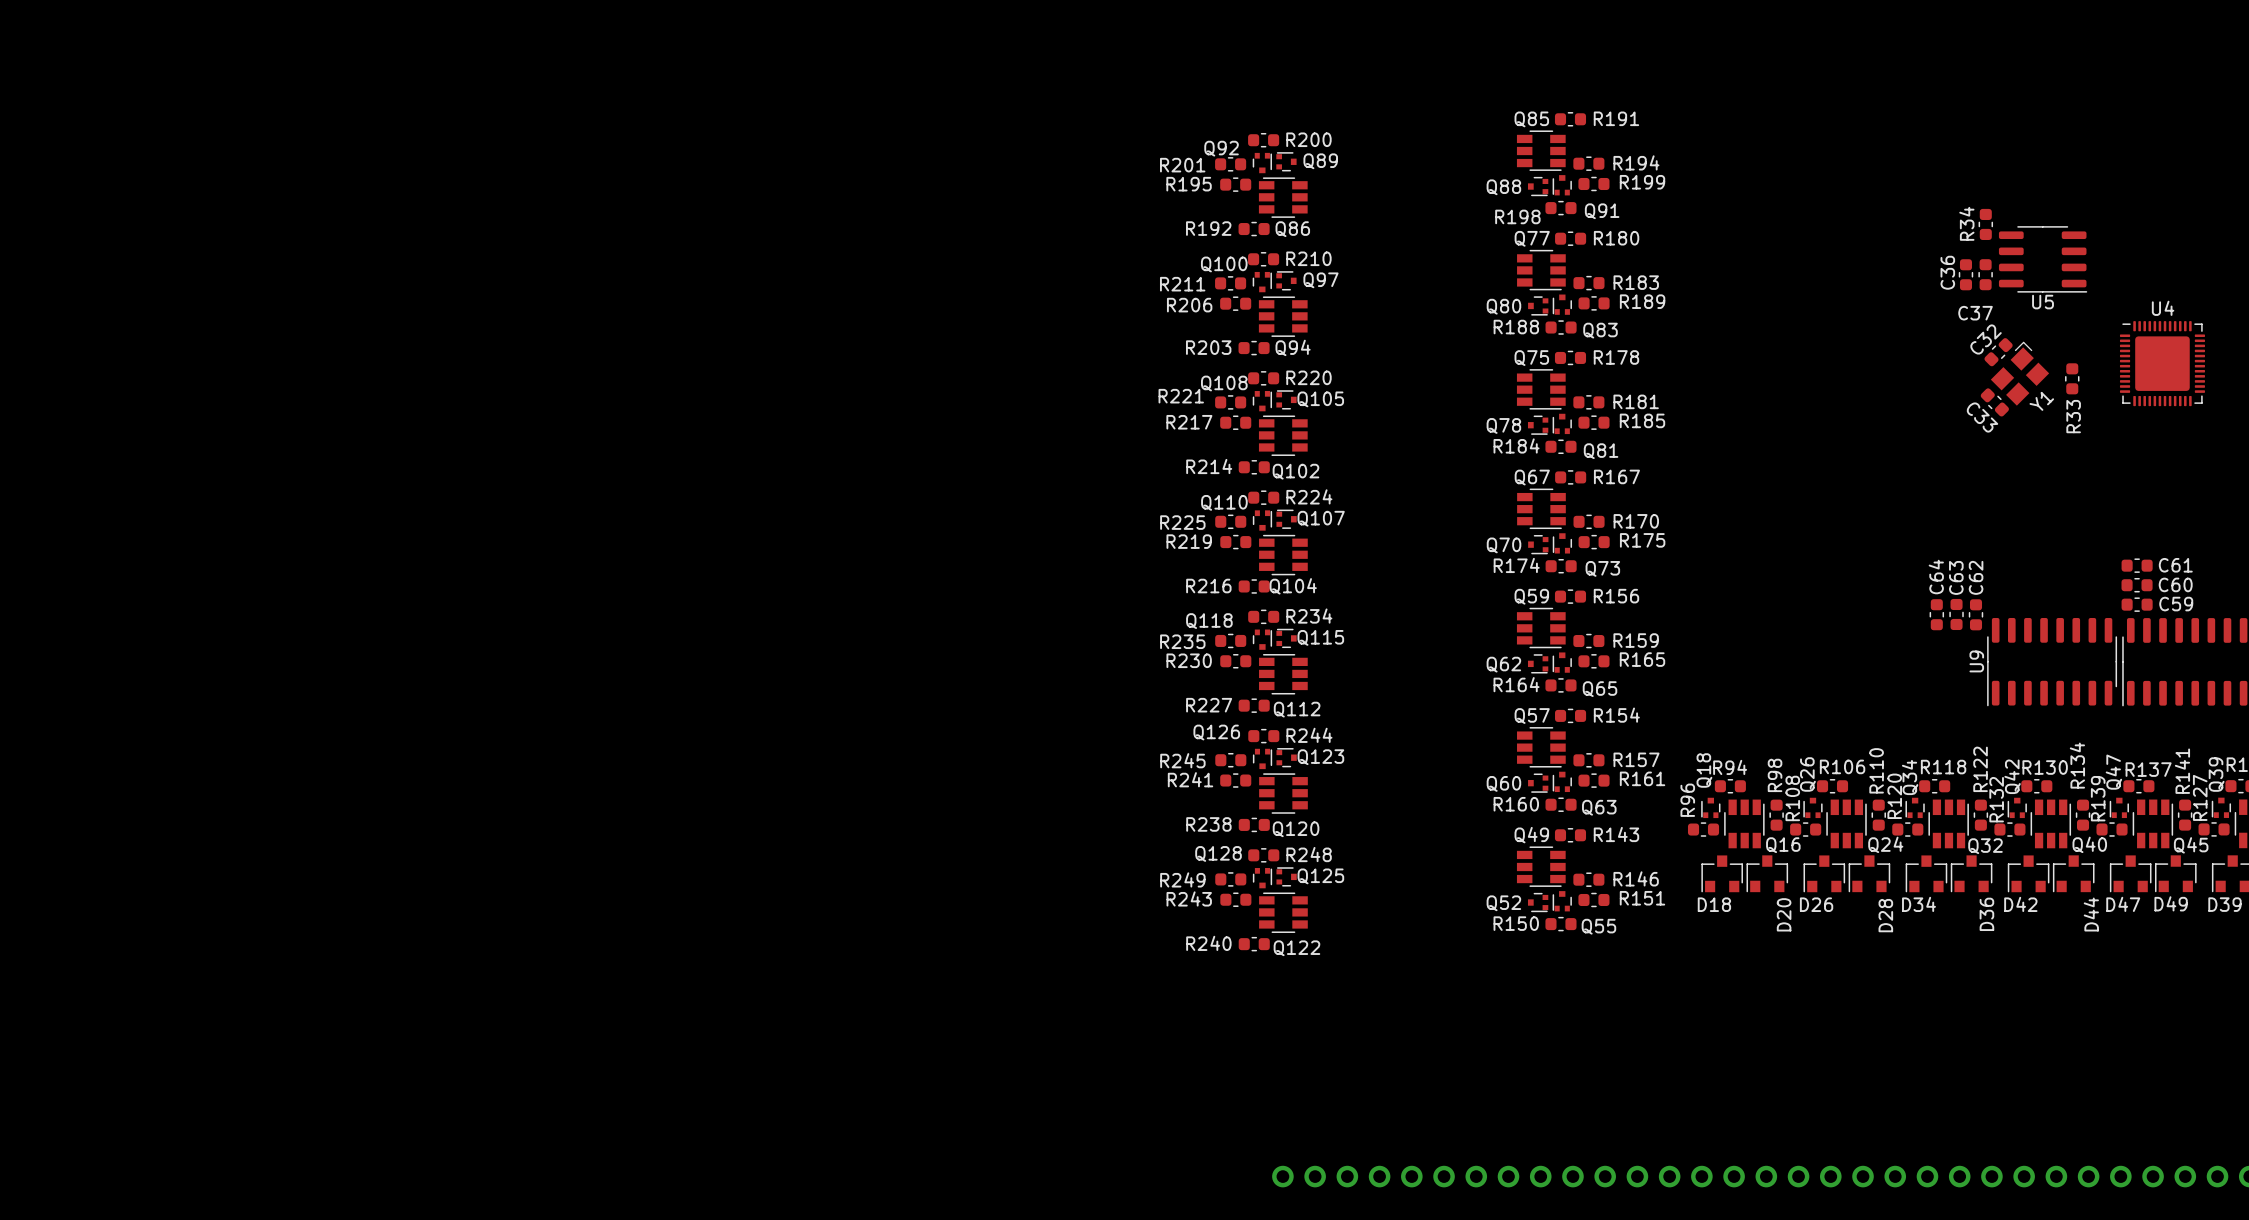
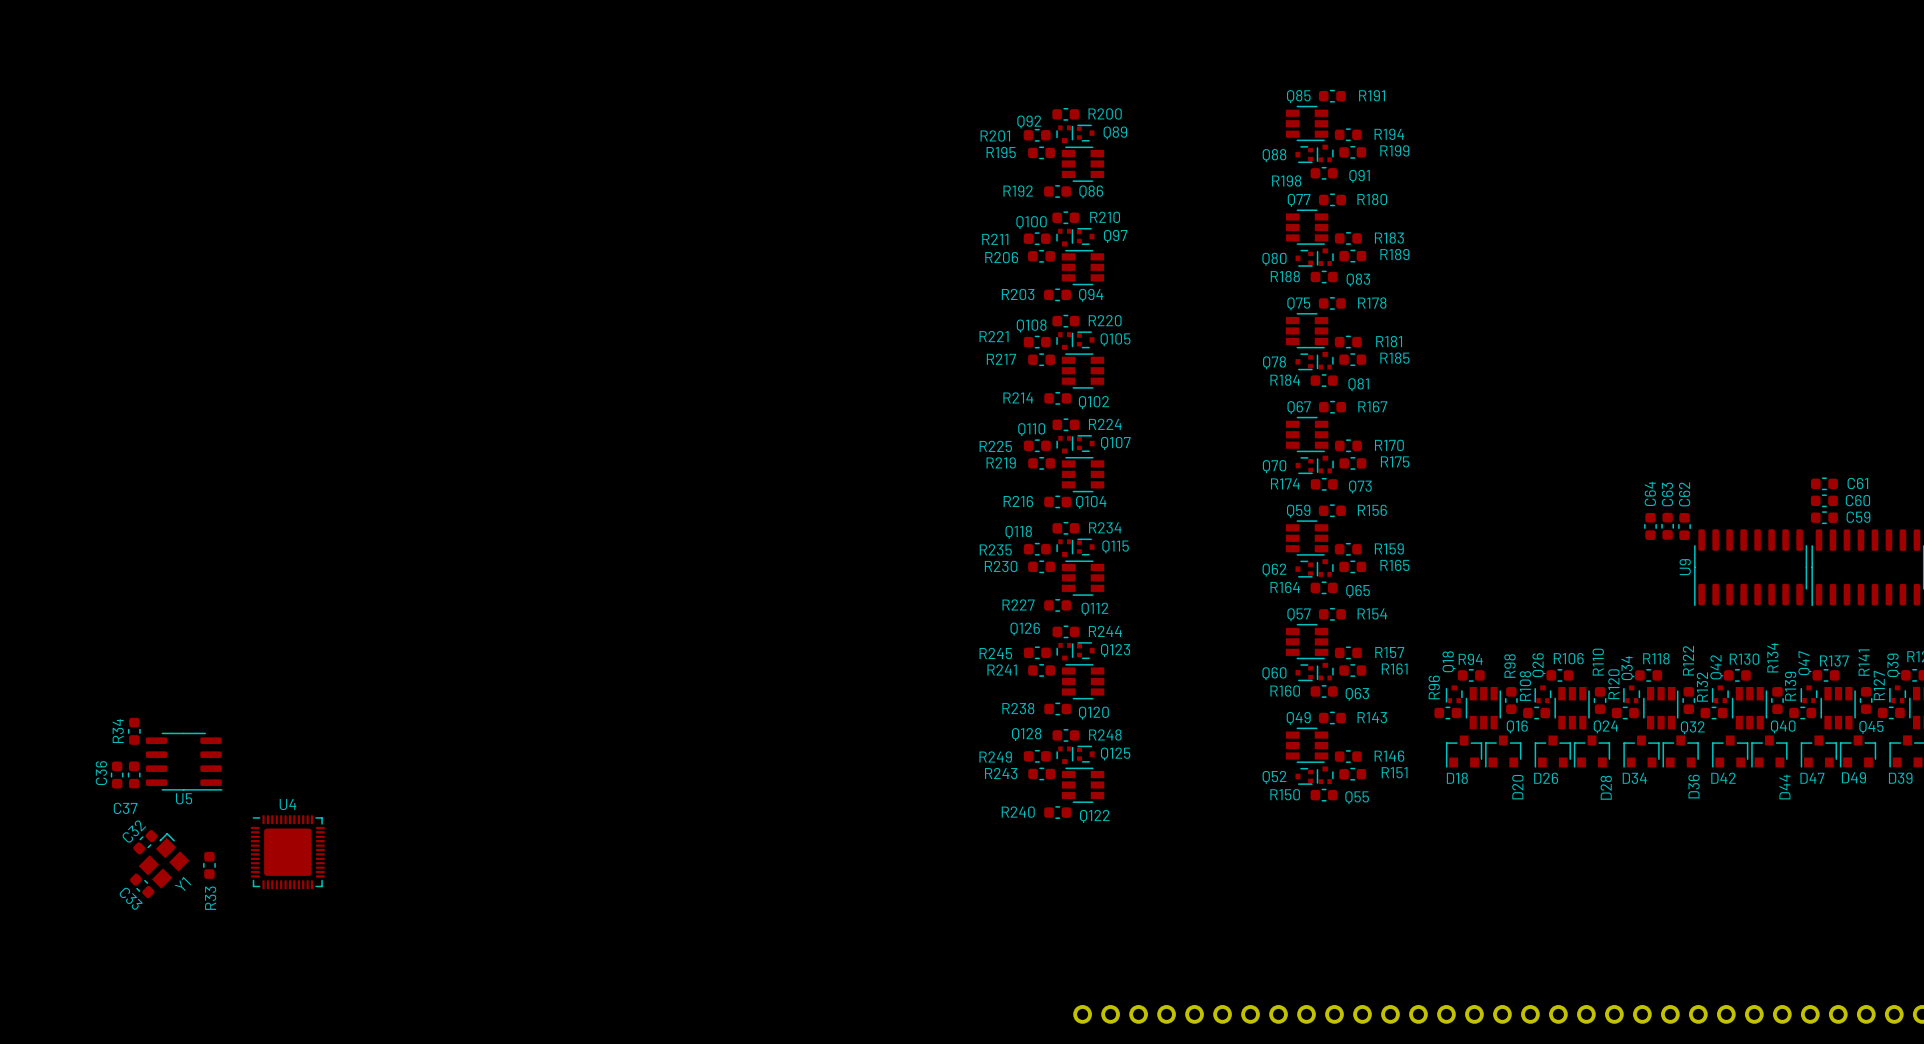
R34 position: (1985, 224) -> (134, 731)
U5 position: (2043, 259) -> (184, 761)
C36 position: (1965, 274) -> (117, 775)
C37 position: (1985, 274) -> (134, 774)
C32 position: (1998, 352) -> (145, 842)
U4 position: (2162, 363) -> (287, 852)
Y1 position: (2020, 373) -> (164, 860)
R33 position: (2072, 378) -> (209, 865)
C33 position: (1994, 402) -> (142, 885)

